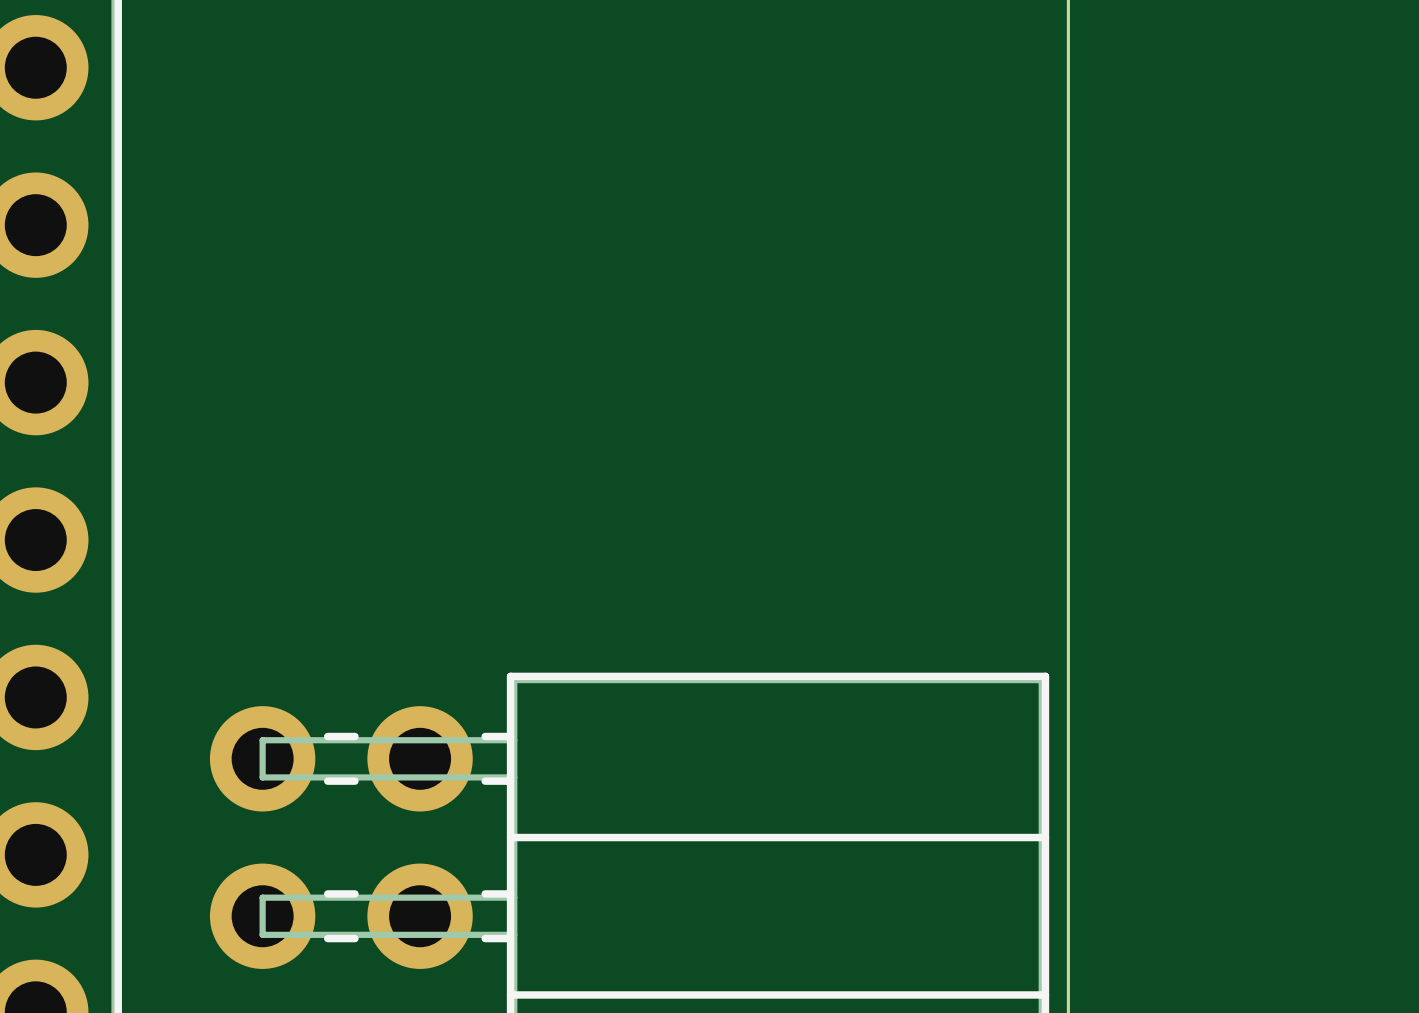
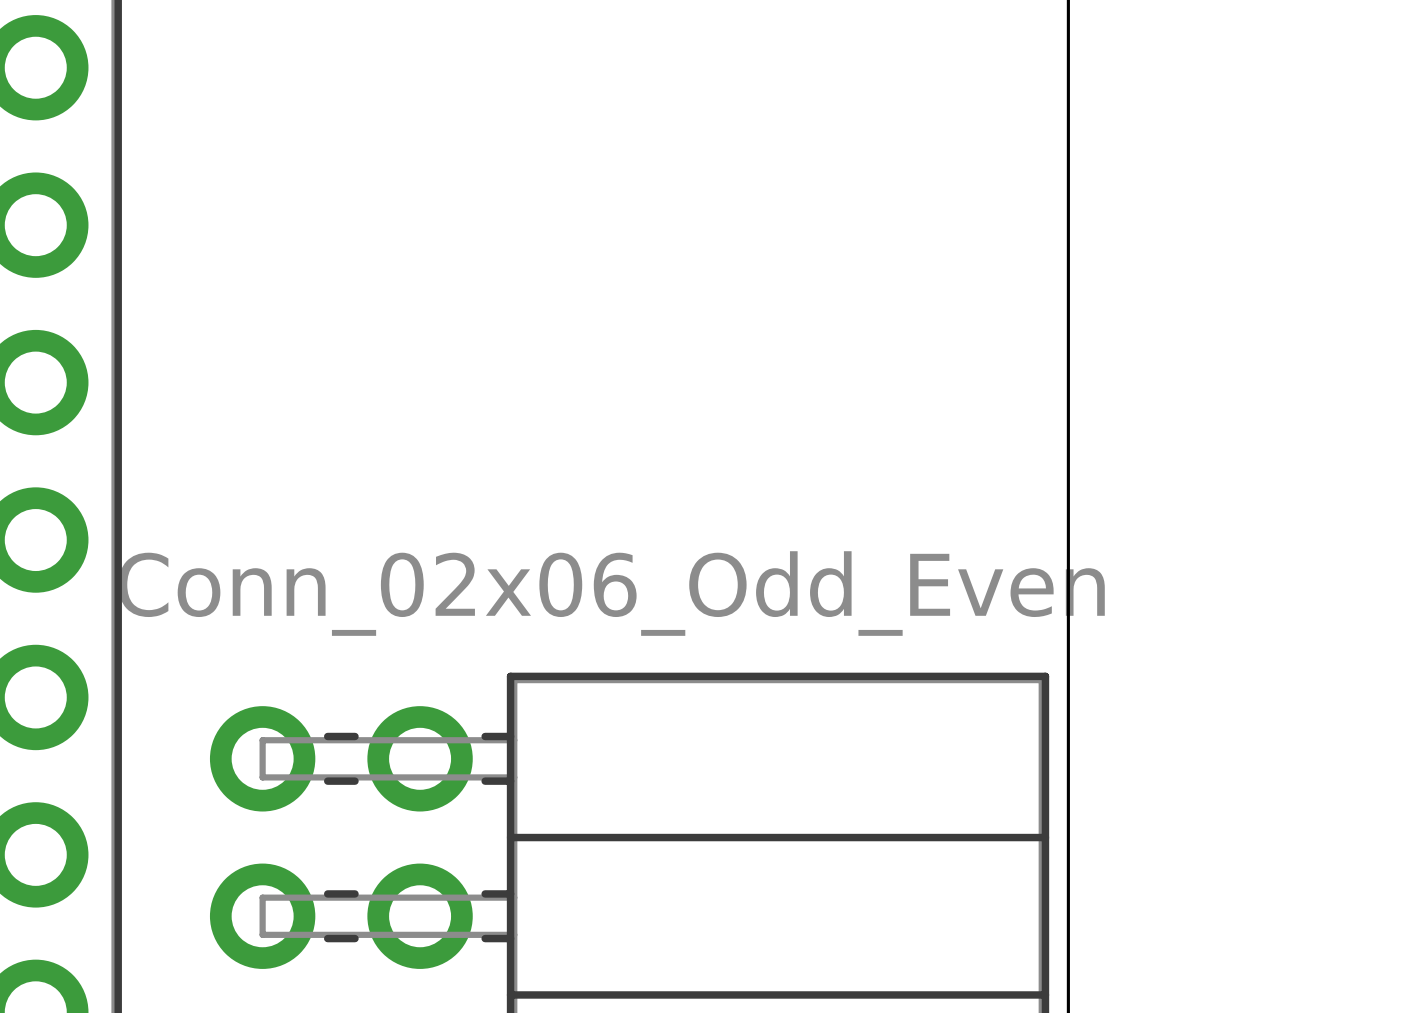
part value: none -> Conn_02x06_Odd_Even (611, 593)

